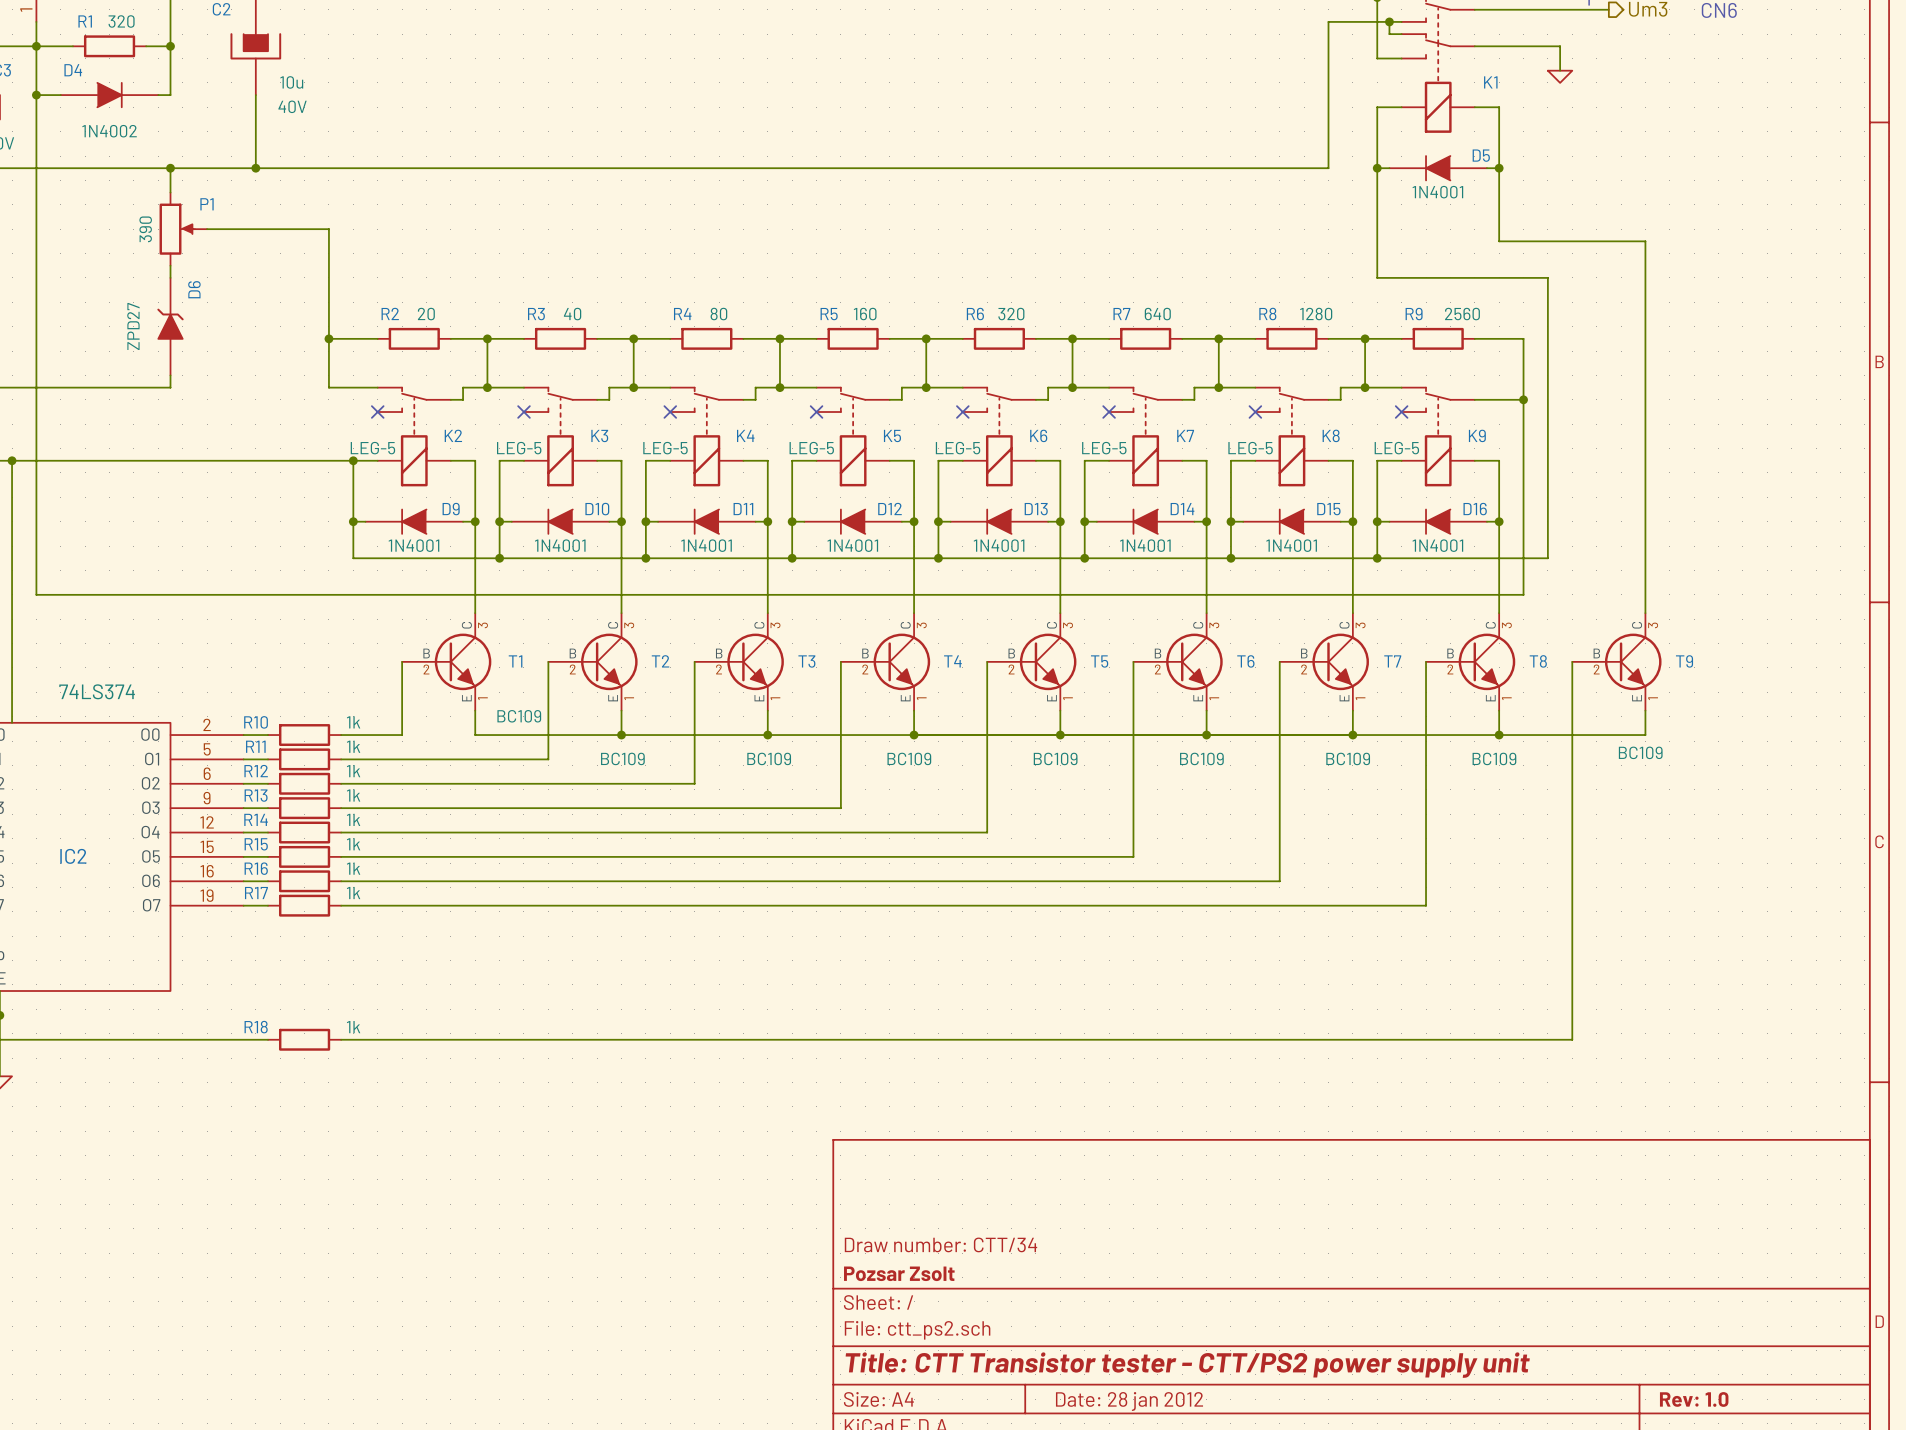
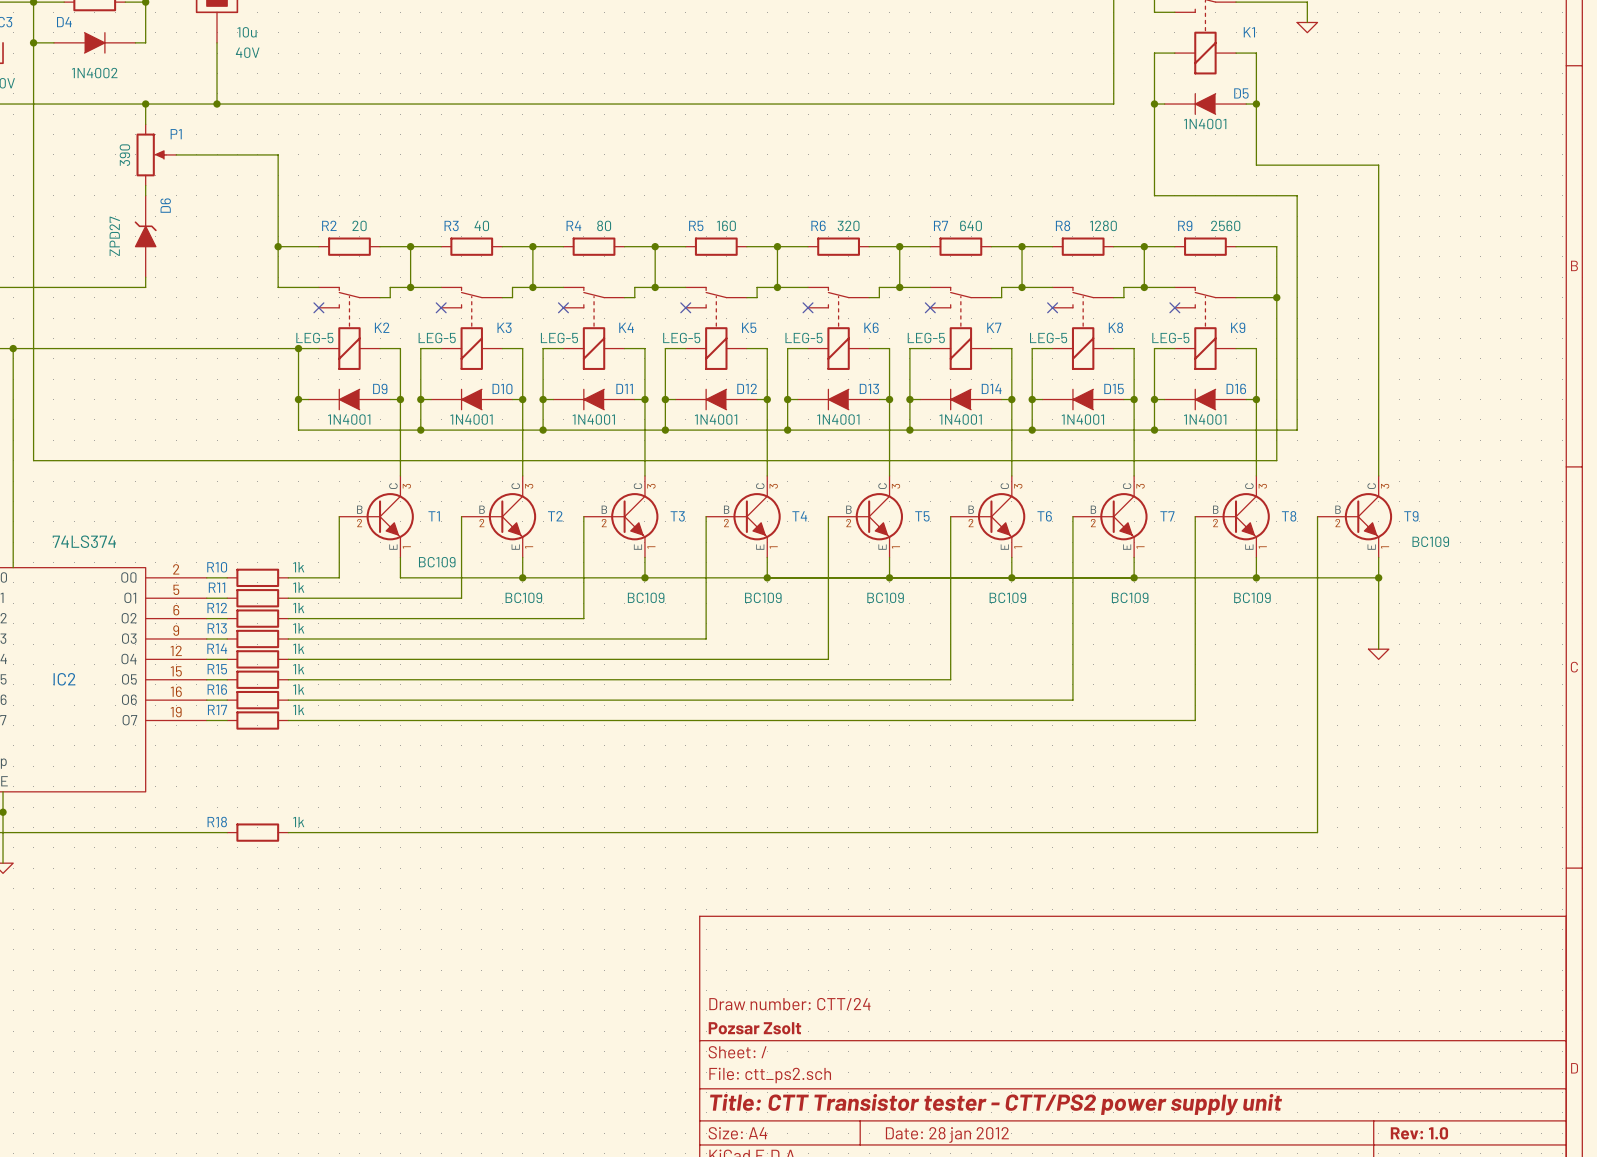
wire: none -> (1378, 577) (1378, 649)
junction: none -> (1378, 577)
T9 value position: BC109 (1640, 752) -> BC109 (1430, 541)
power symbol: none -> (1378, 654)
title block: Draw number: CTT/34 (940, 1244) -> Draw number: CTT/24 (789, 1004)

